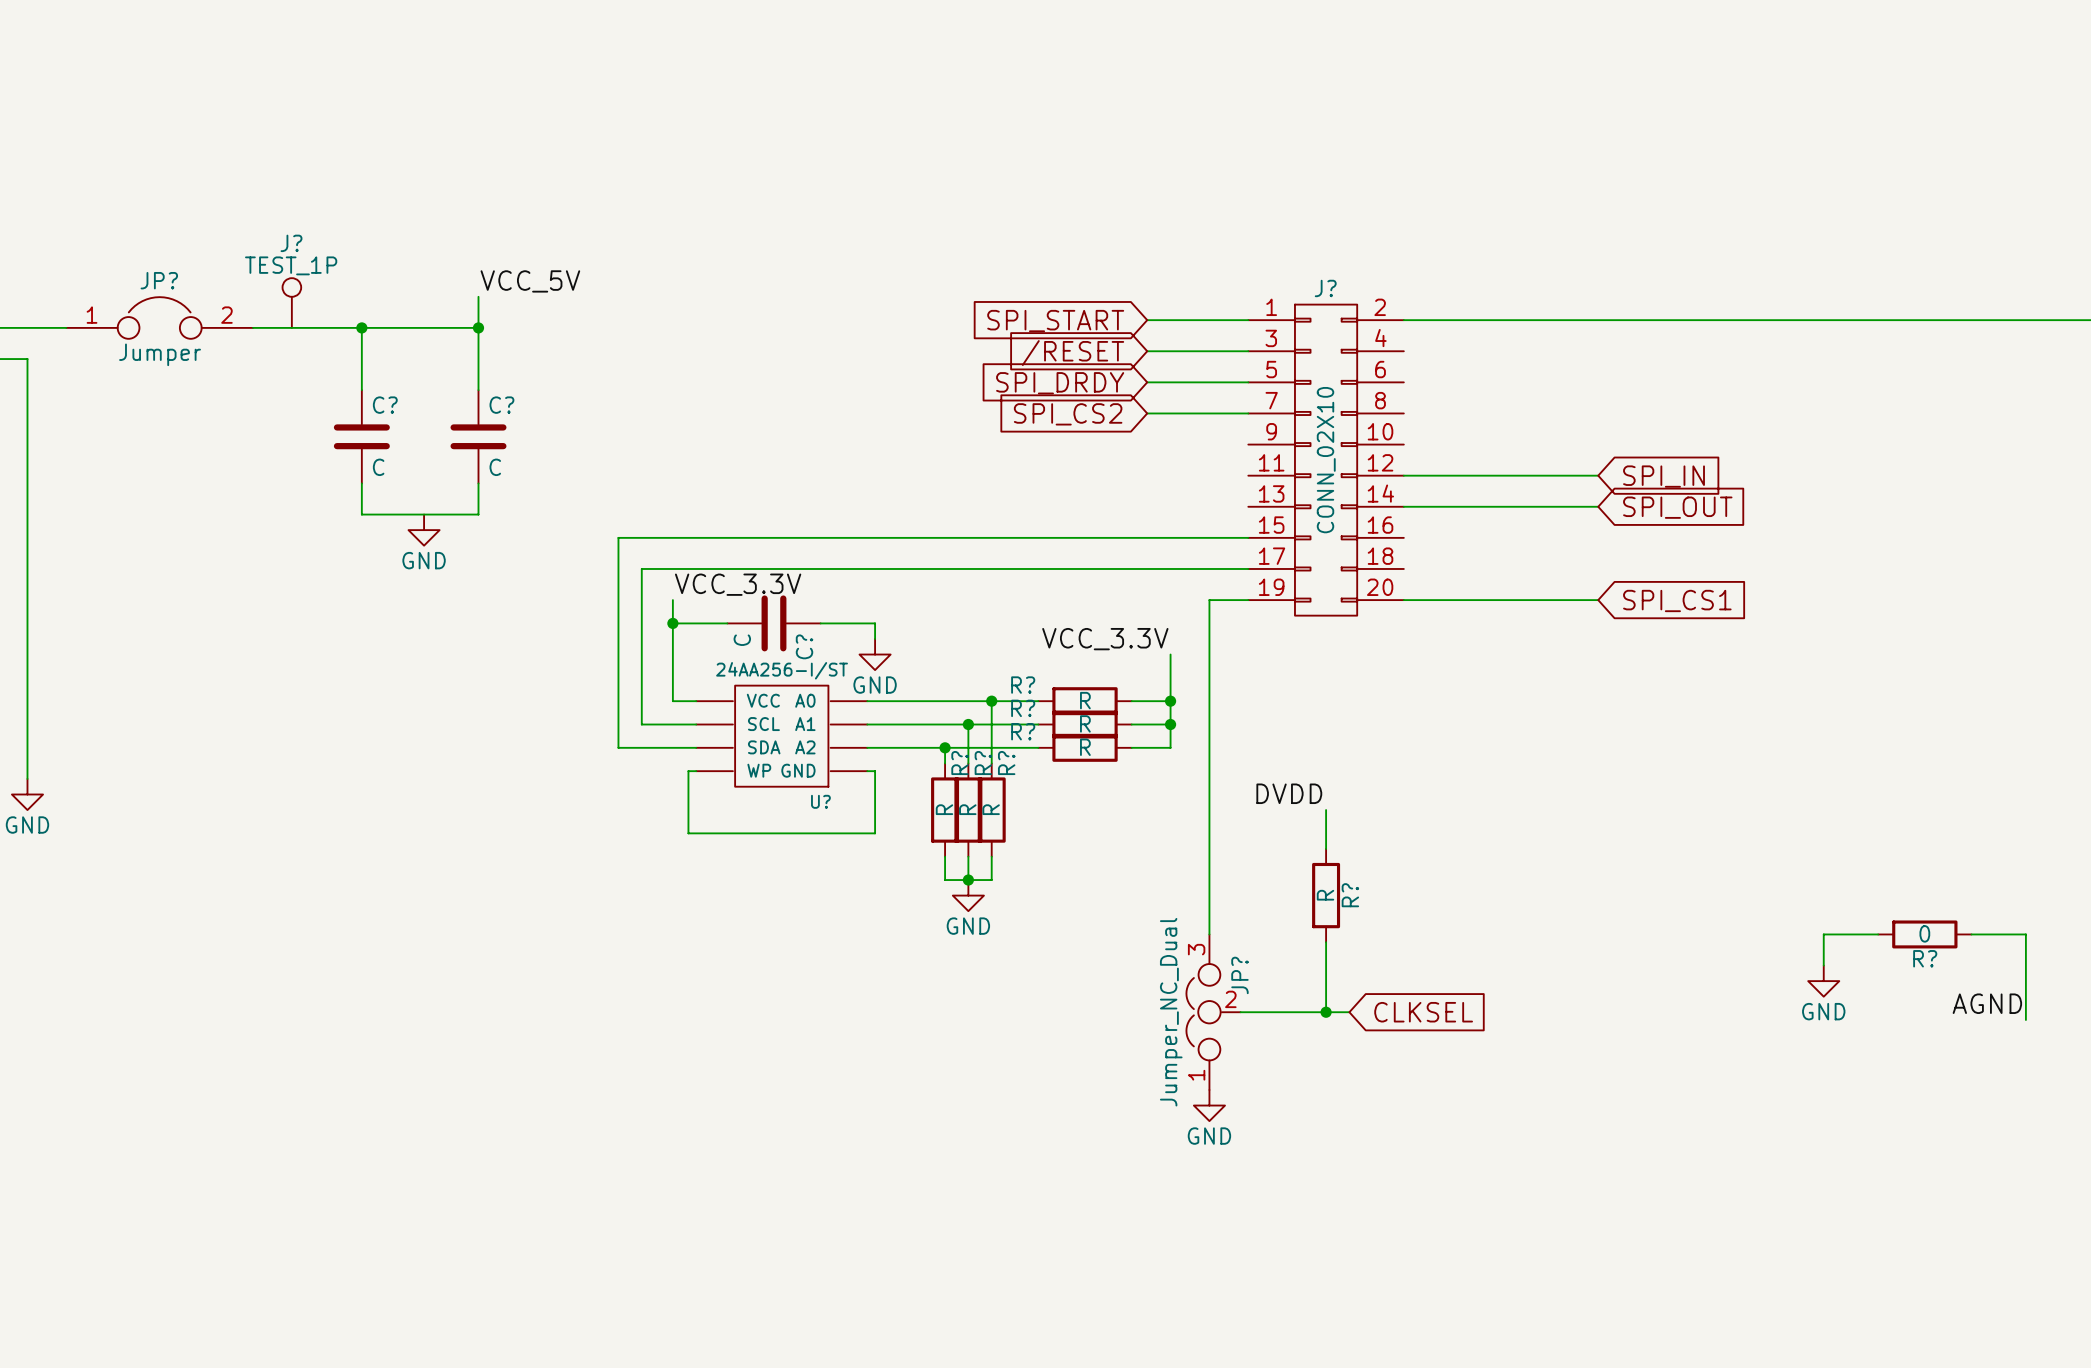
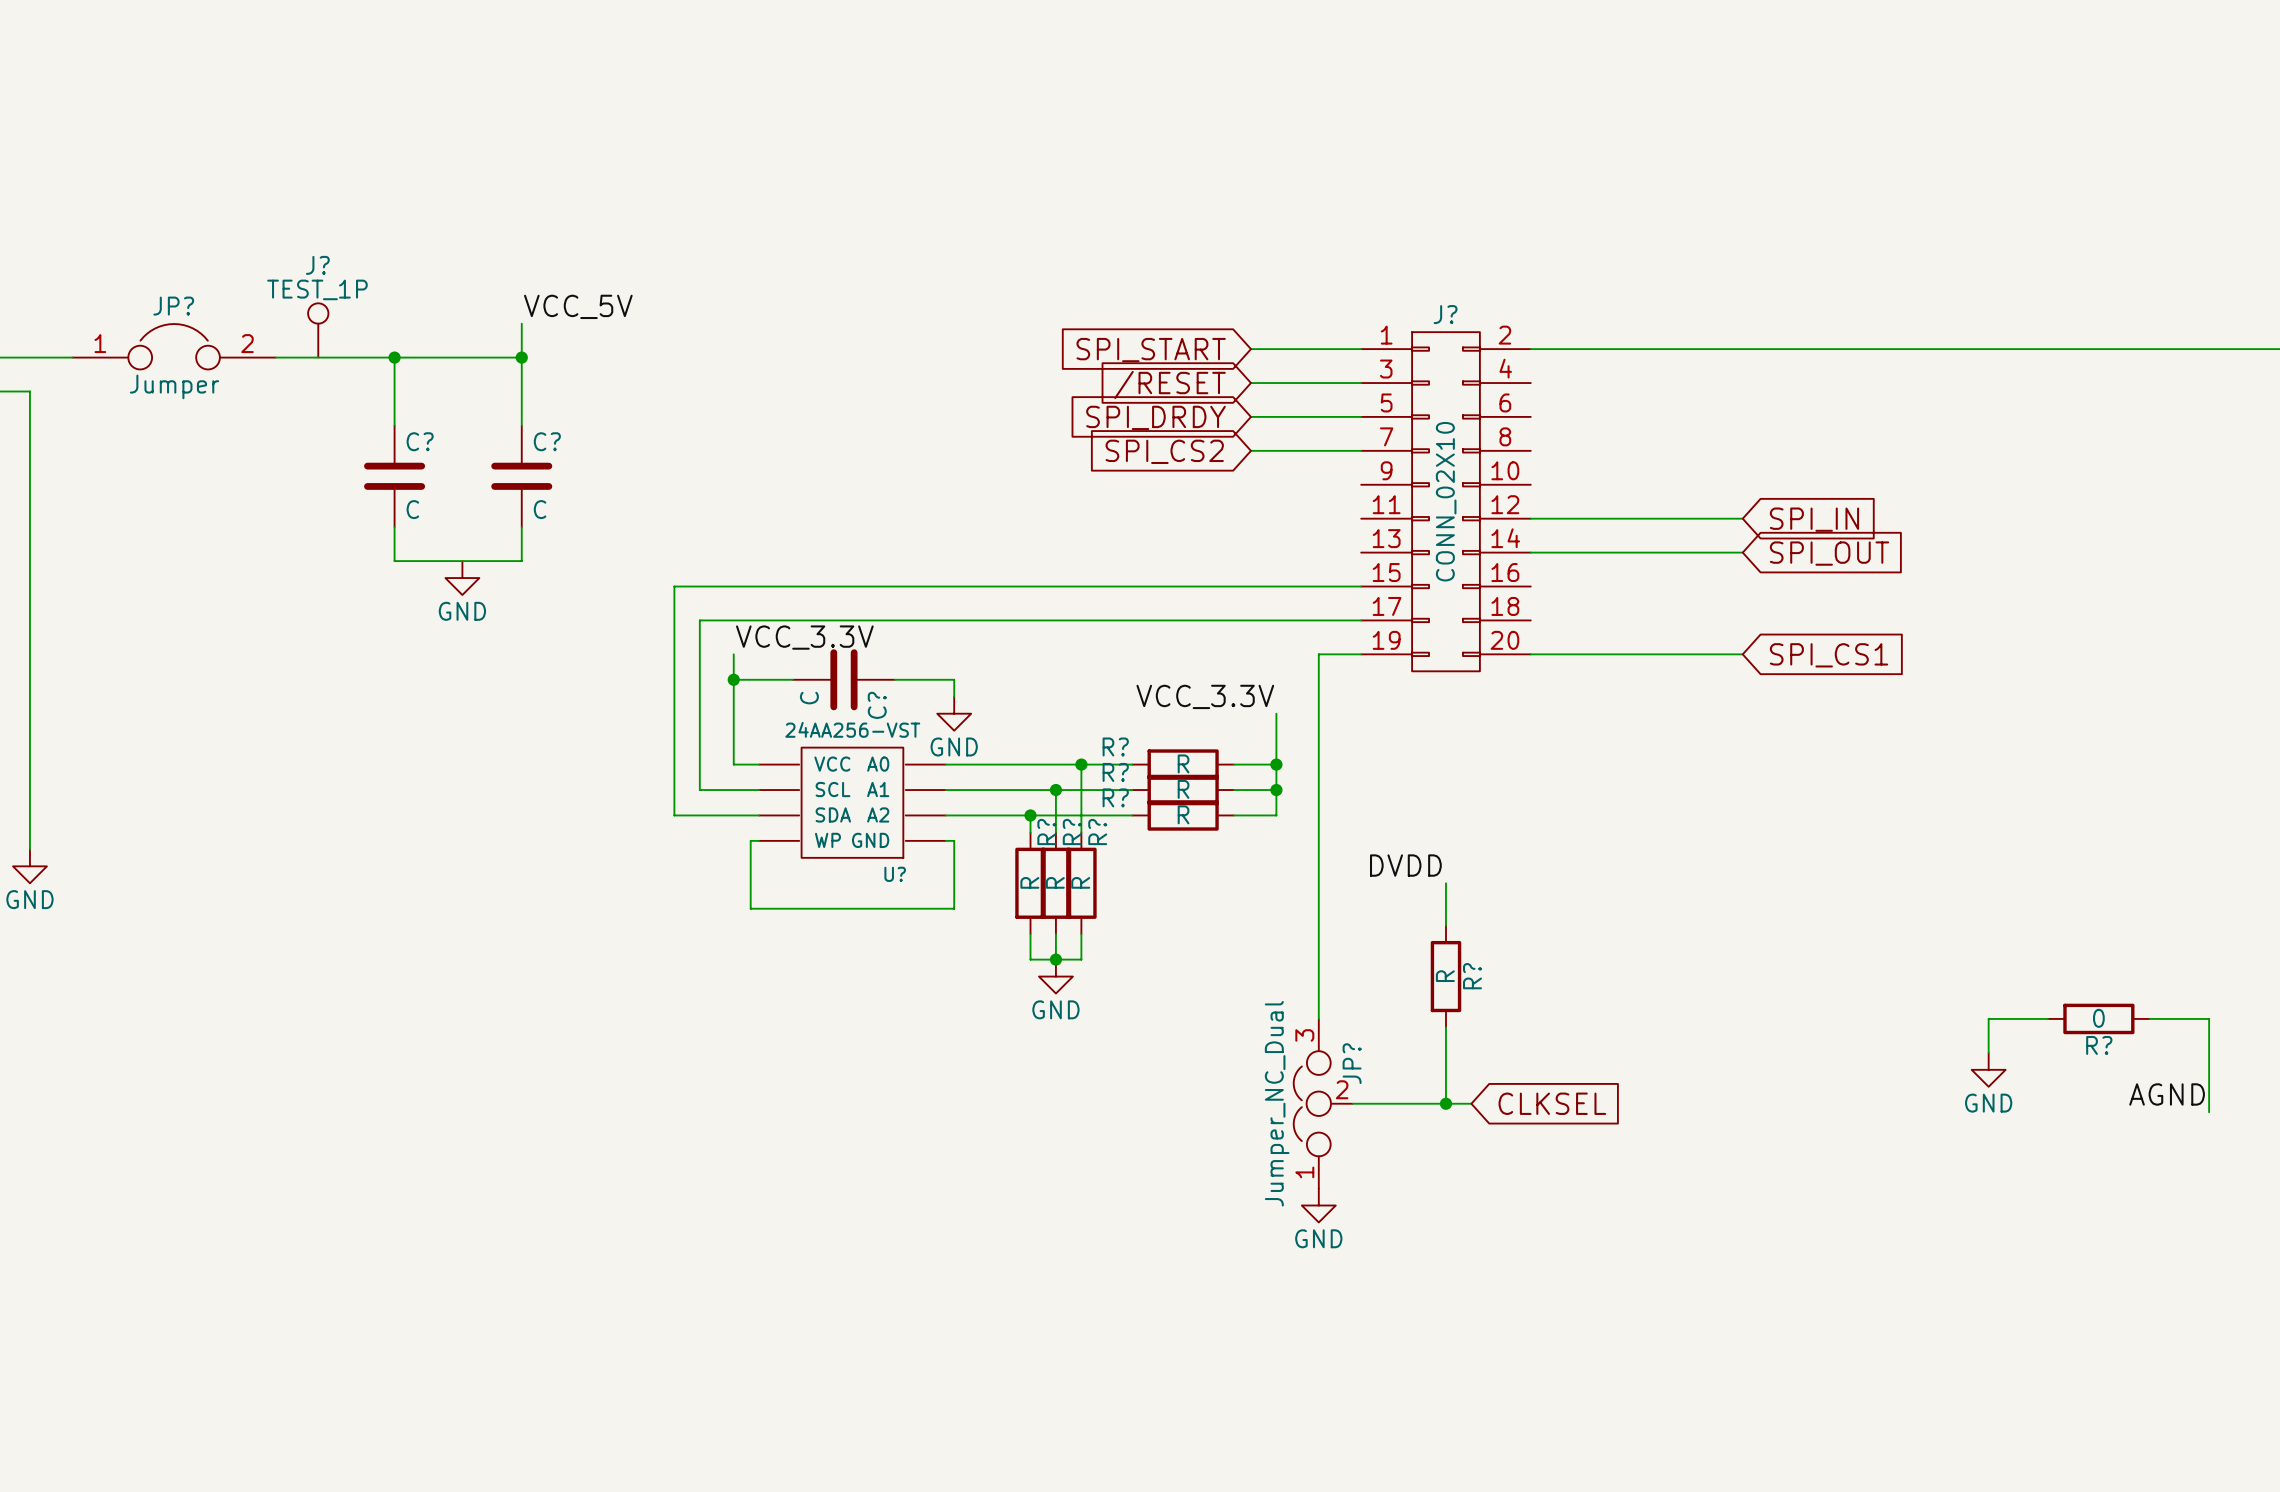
U? value: 24AA256-I/ST (782, 670) -> 24AA256-VST (852, 729)

